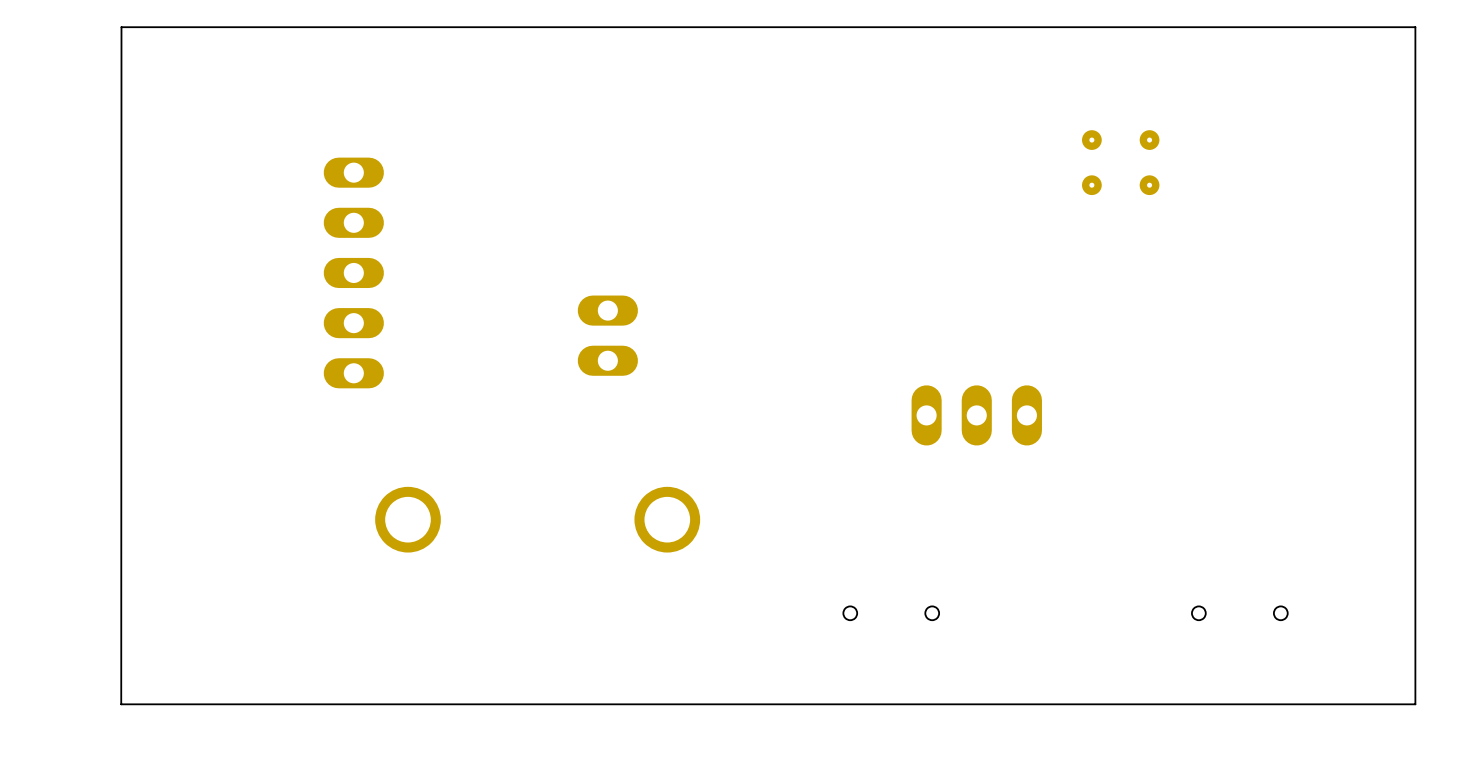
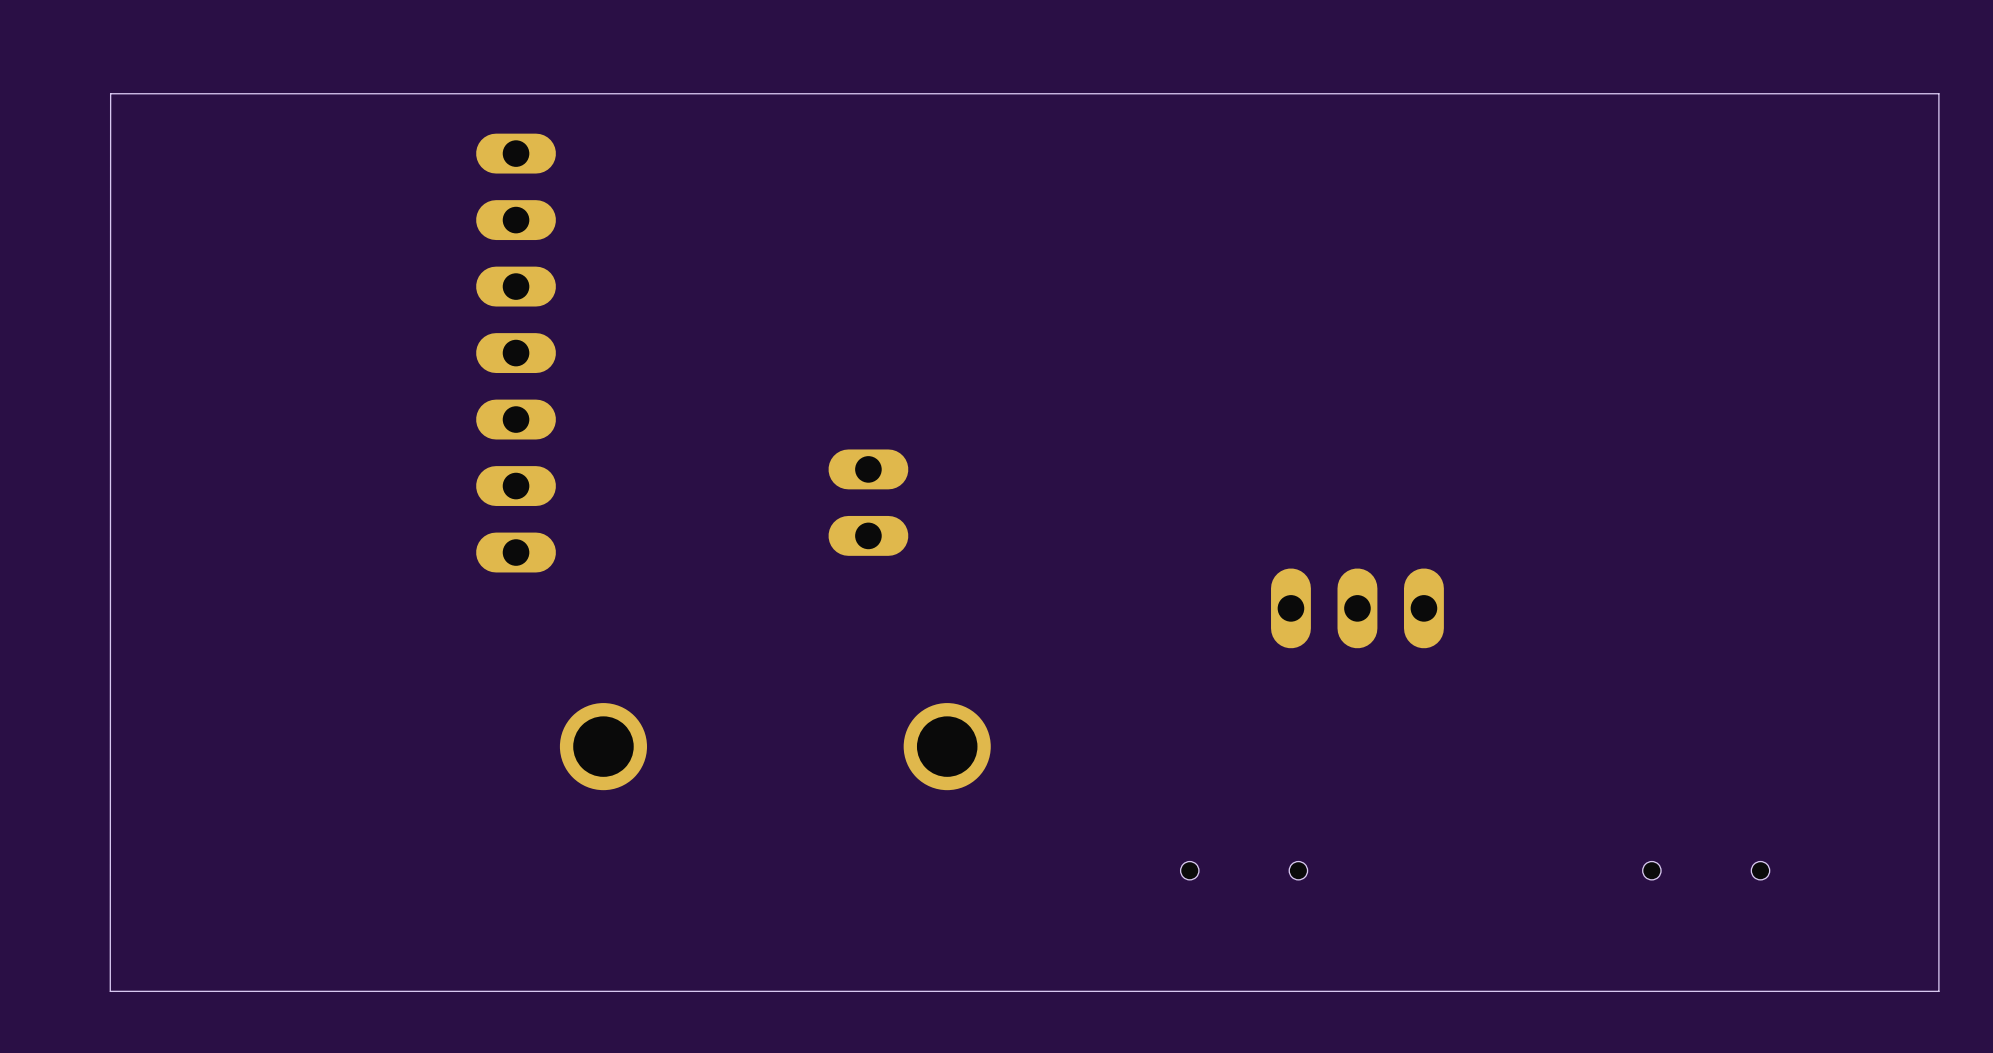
board edge: (121, 27) (121, 704) -> (223, 93) (110, 93) (110, 991) (223, 991)
part: (1091, 140) -> none
part: (1149, 140) -> none
part: (1091, 185) -> none
part: (1149, 185) -> none
part: none -> (516, 353)
part: (353, 272) -> none

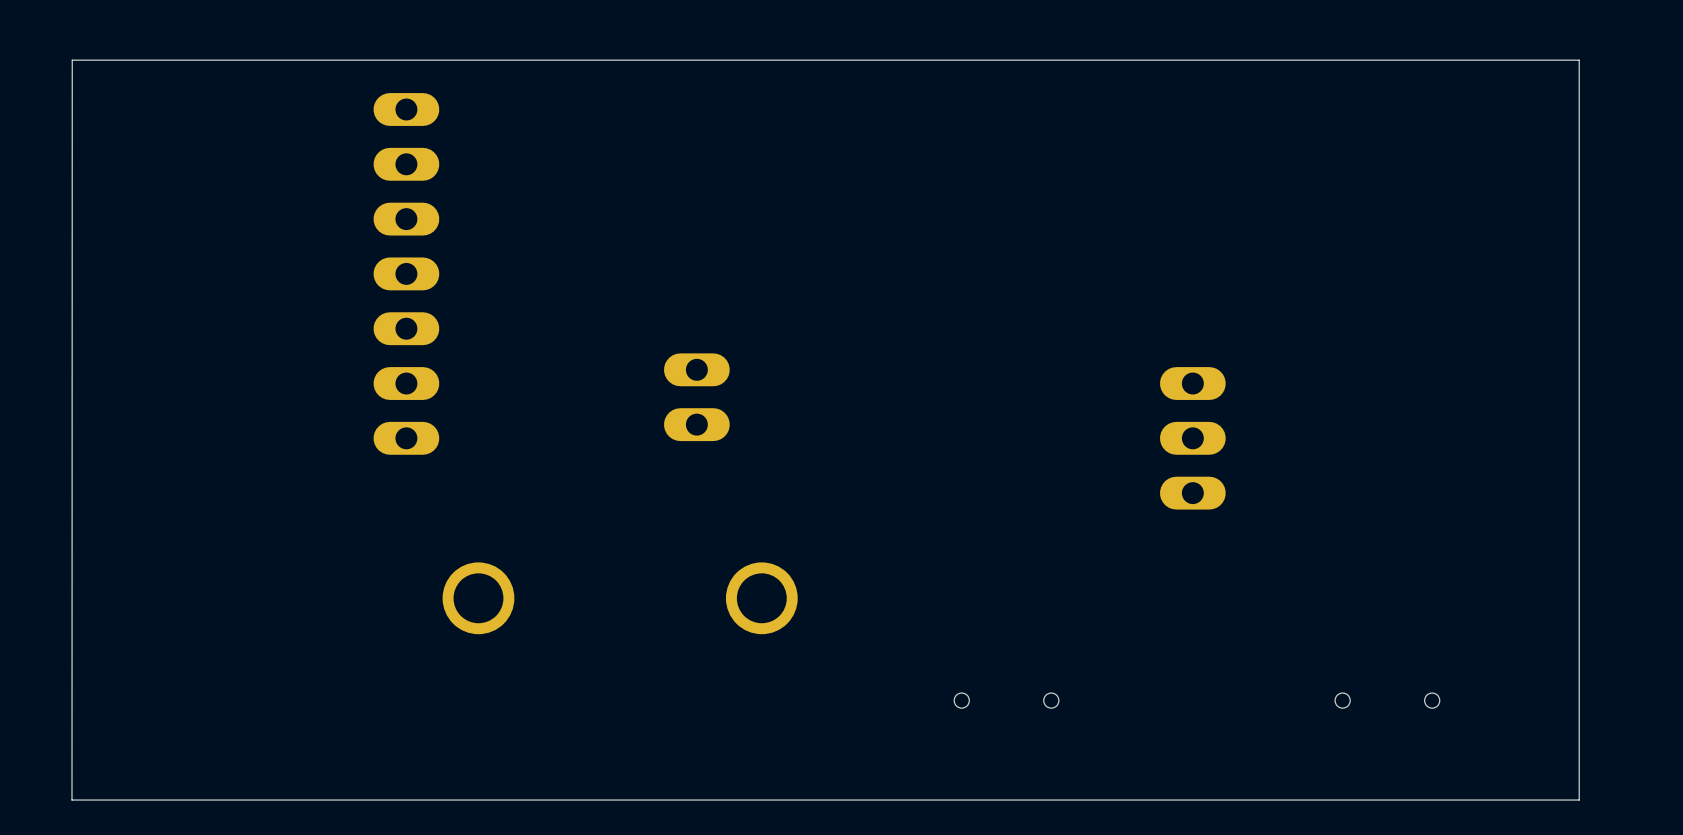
part rotation: 0° (1357, 608) -> 90° clockwise (1192, 438)
part position: (1357, 608) -> (1192, 438)

